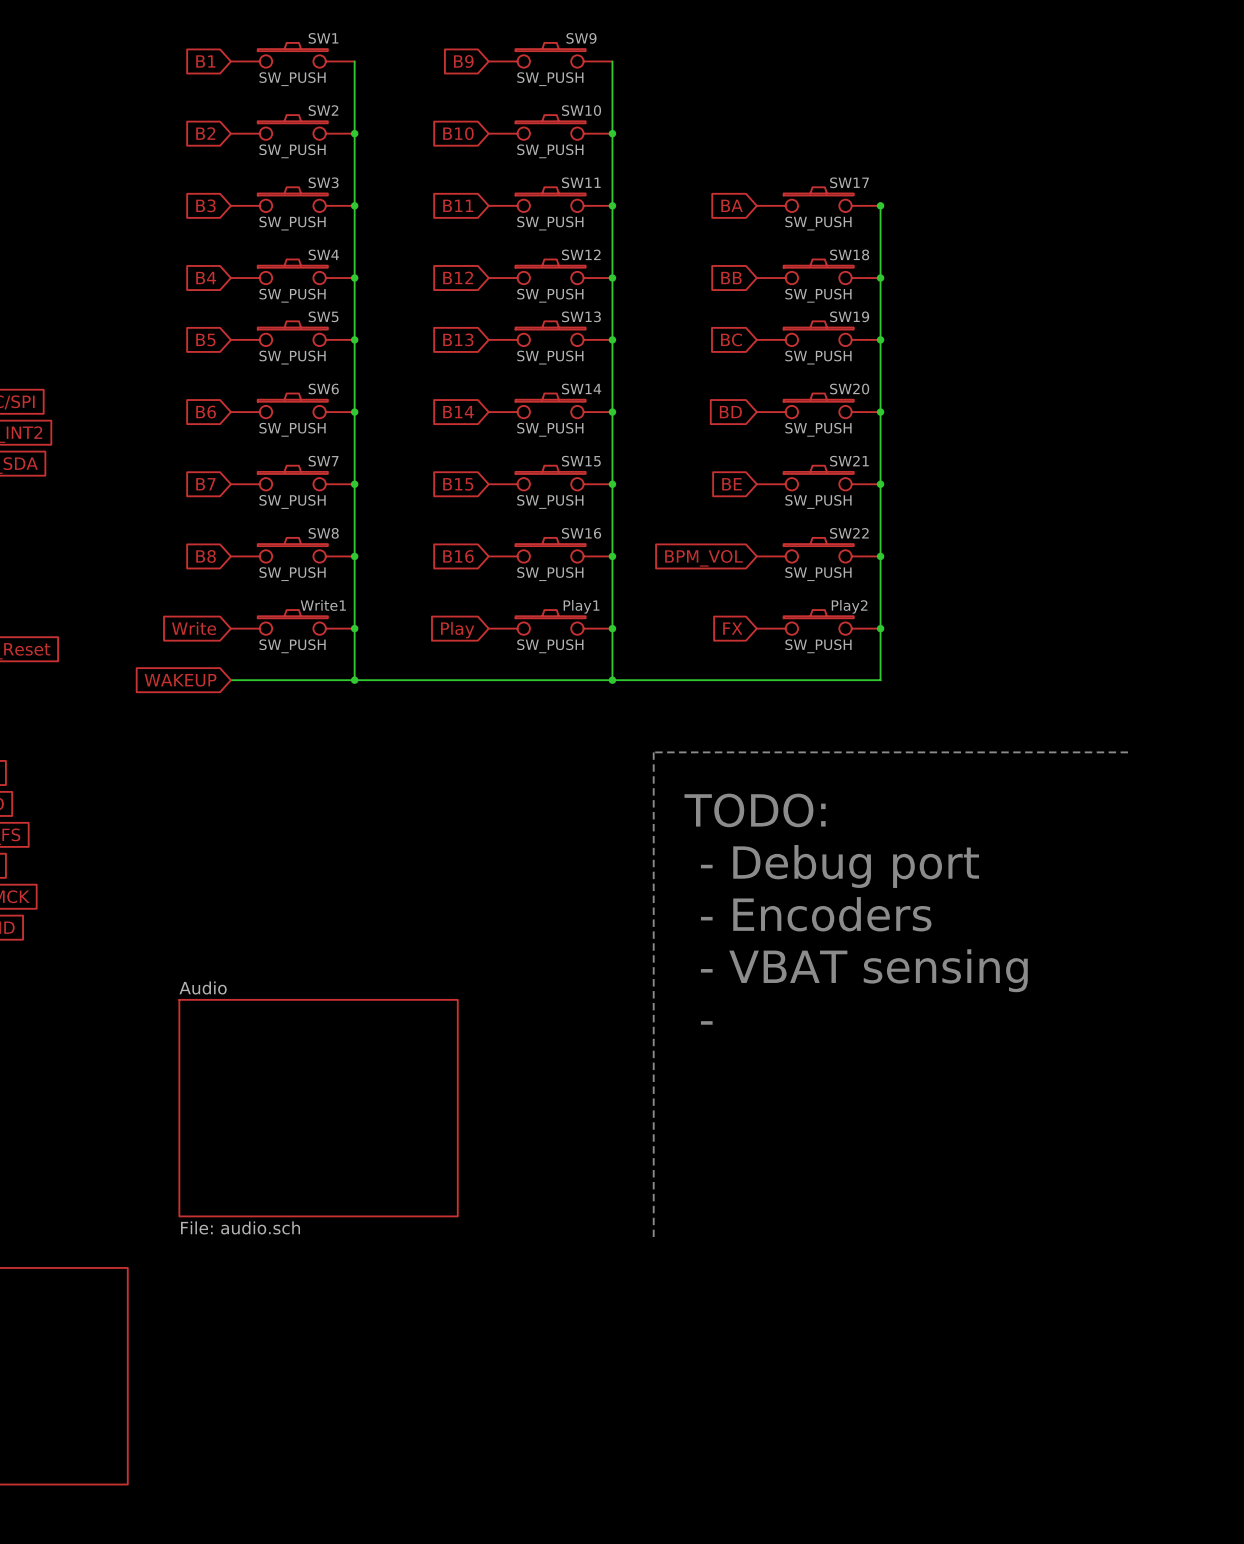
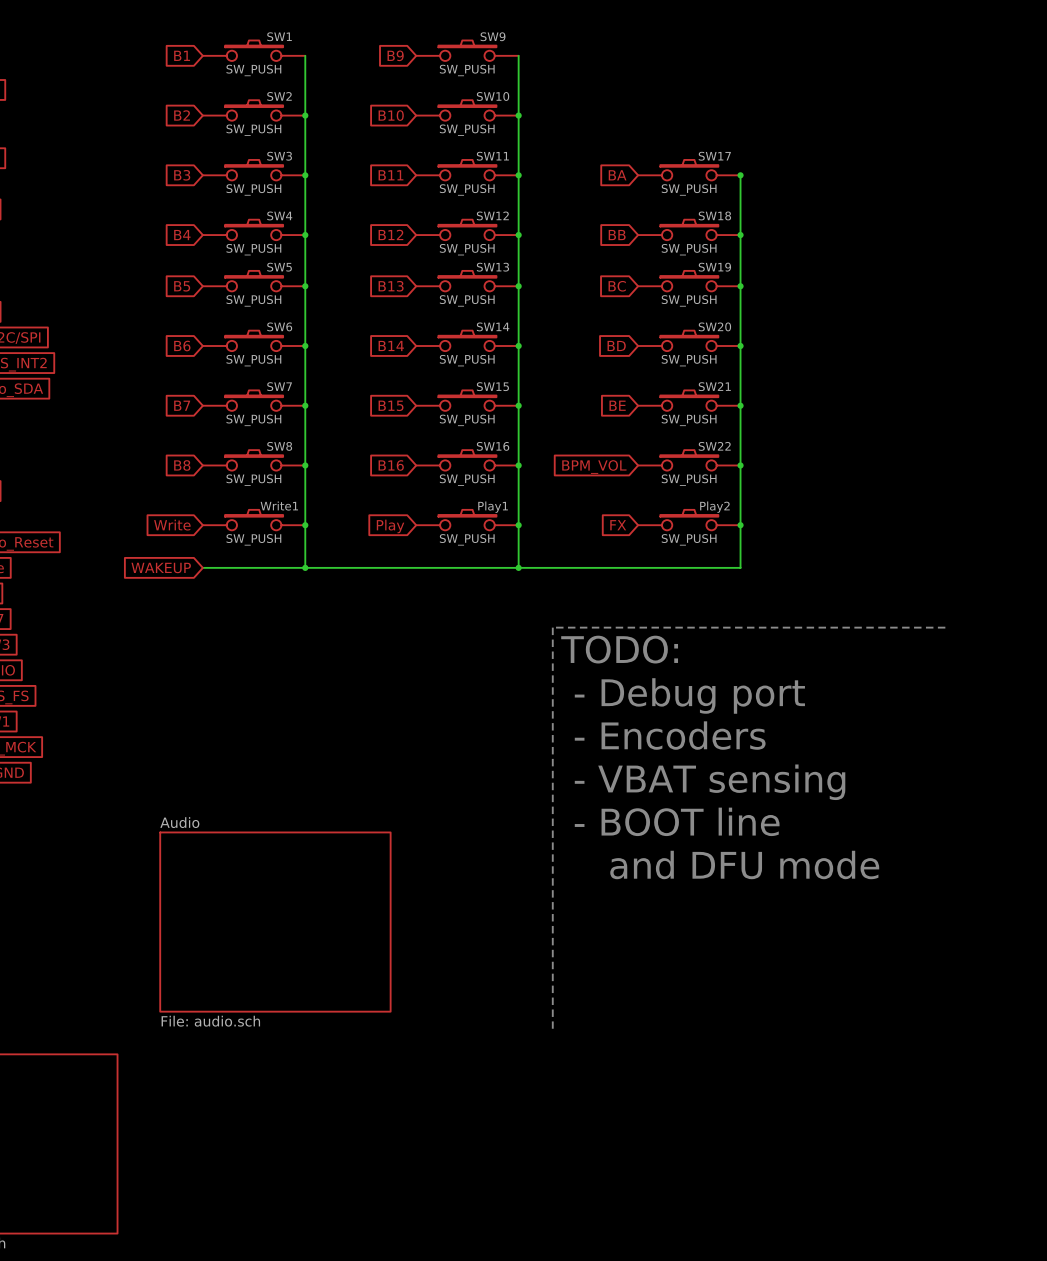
text position: TODO: (755, 810) -> TODO: (619, 649)
text position: - Debug port (839, 866) -> - Debug port (689, 695)
text position: - Encoders (816, 914) -> - Encoders (670, 735)
text position: - VBAT sensing (864, 970) -> - VBAT sensing (710, 782)
text: none -> - BOOT line (677, 821)
text: - (706, 1022) -> none
text: none -> and DFU mode (744, 864)

